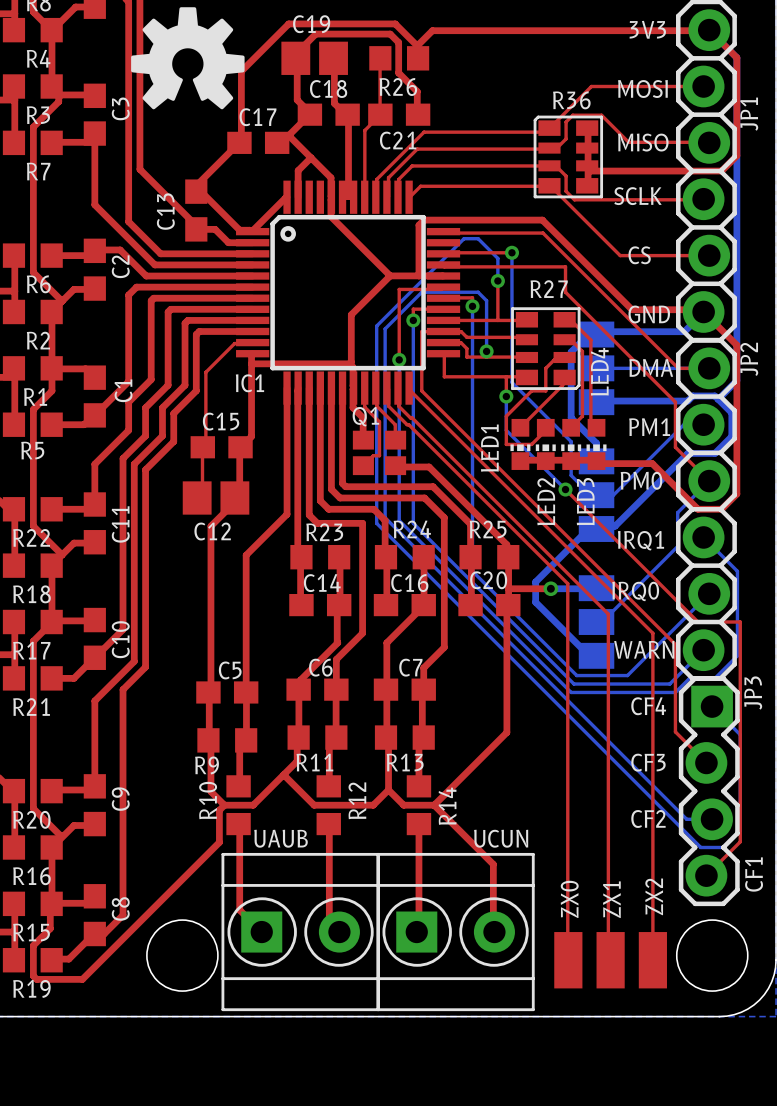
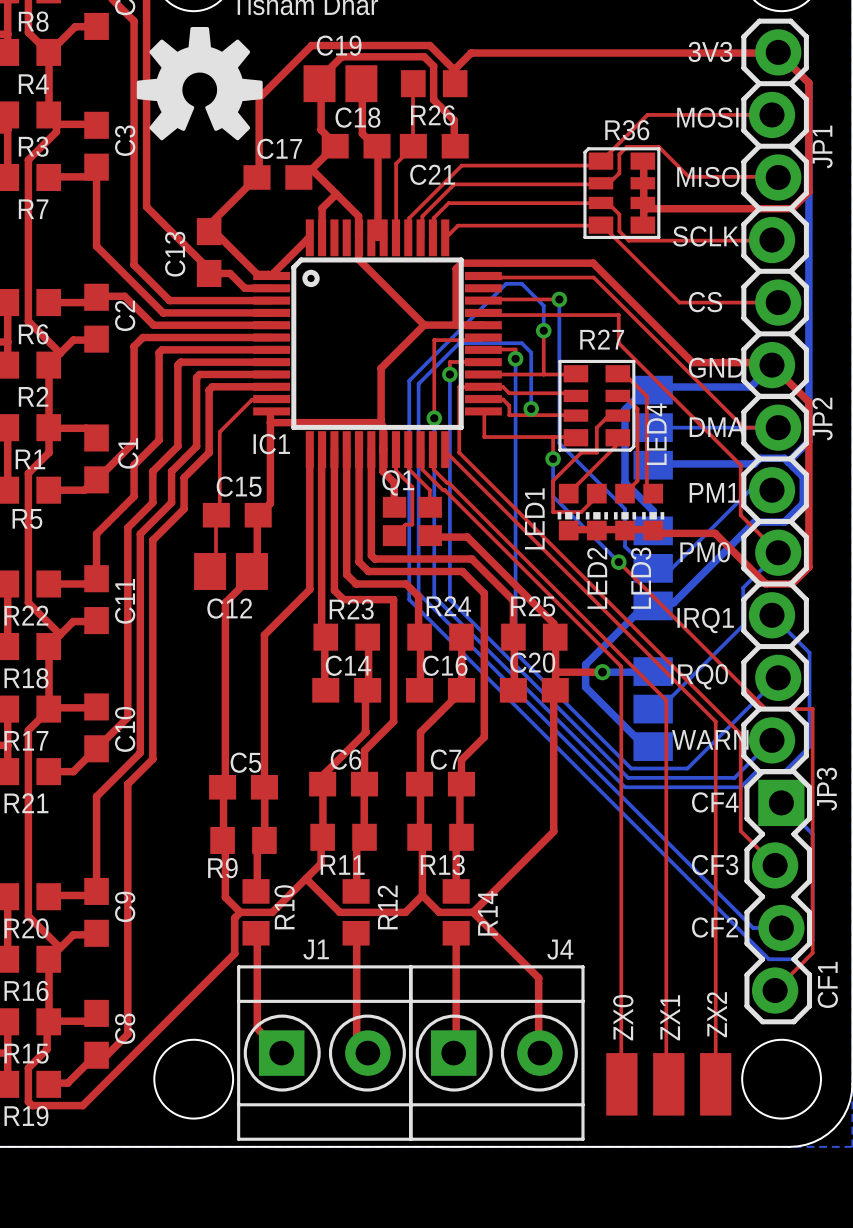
R10 name position: R10 (208, 800) -> R10 (284, 907)
UAUB name: UAUB (281, 838) -> J1 (316, 949)
UCUN name: UCUN (501, 838) -> J4 (560, 949)

